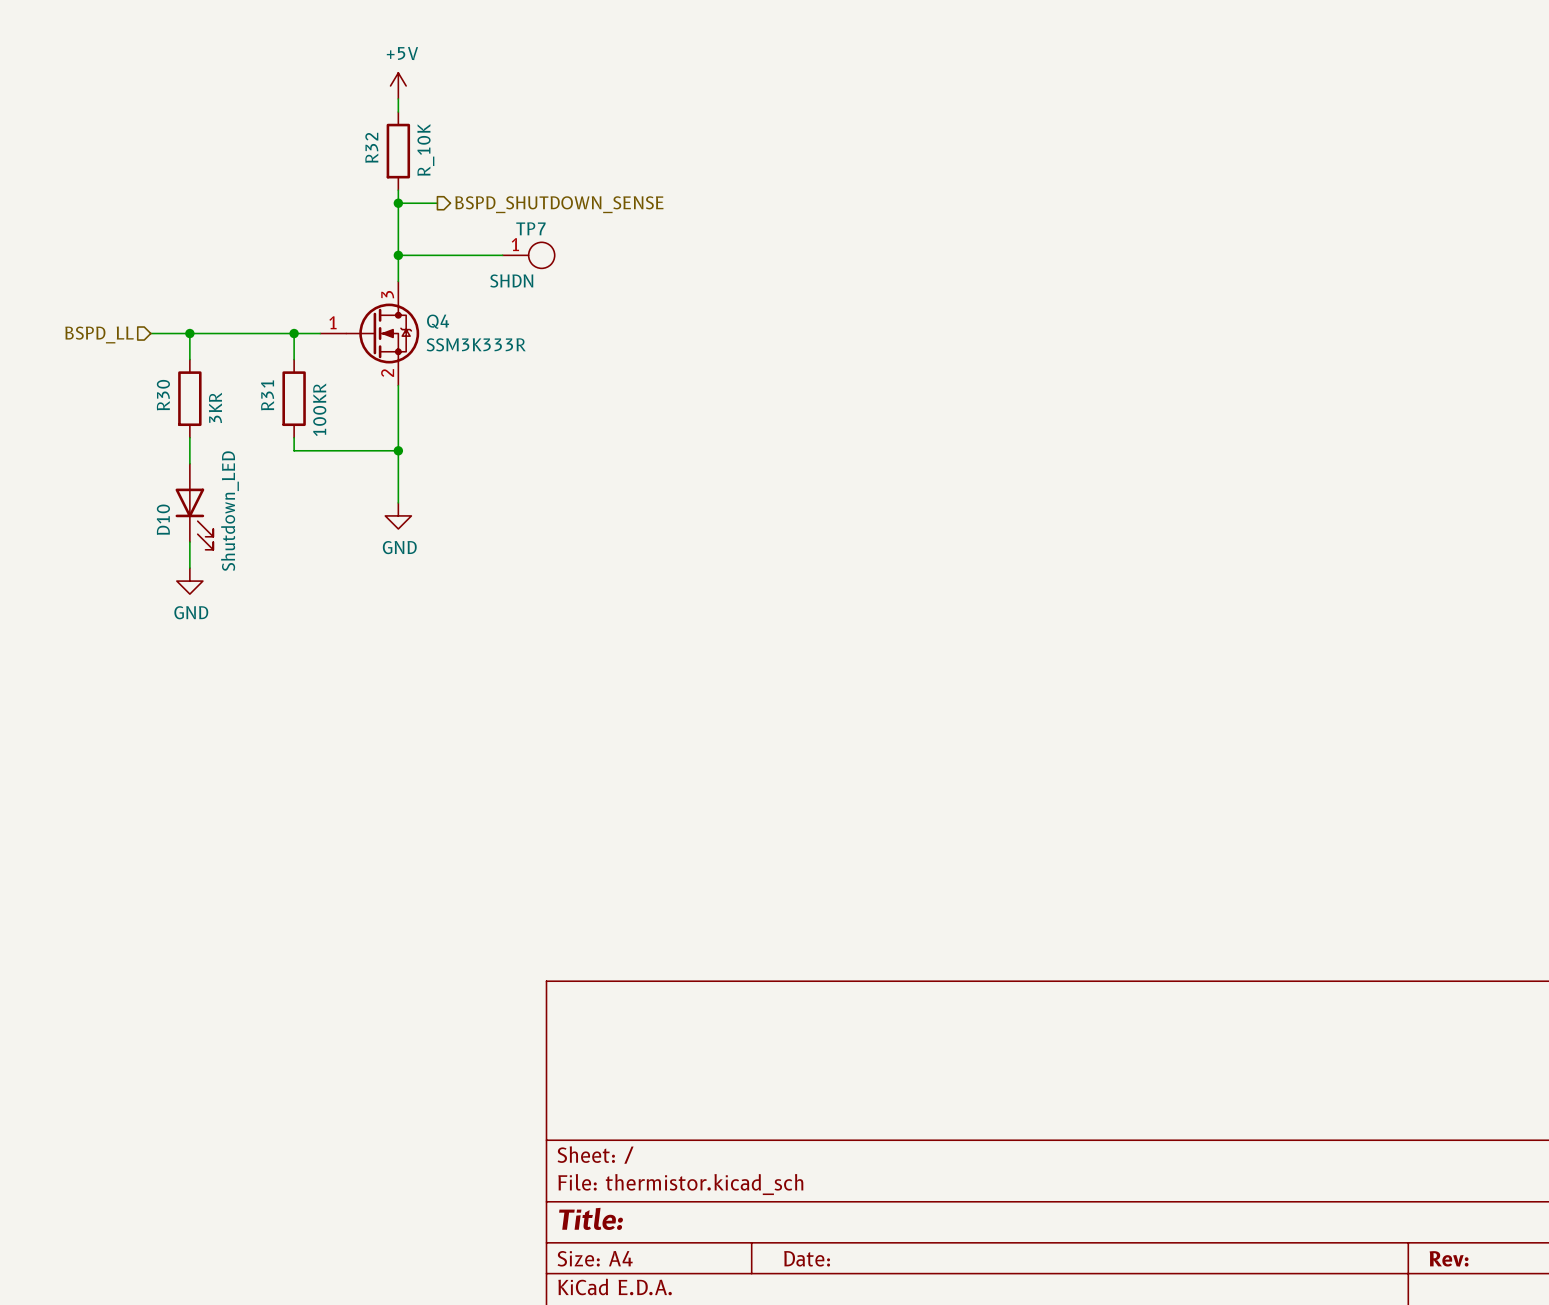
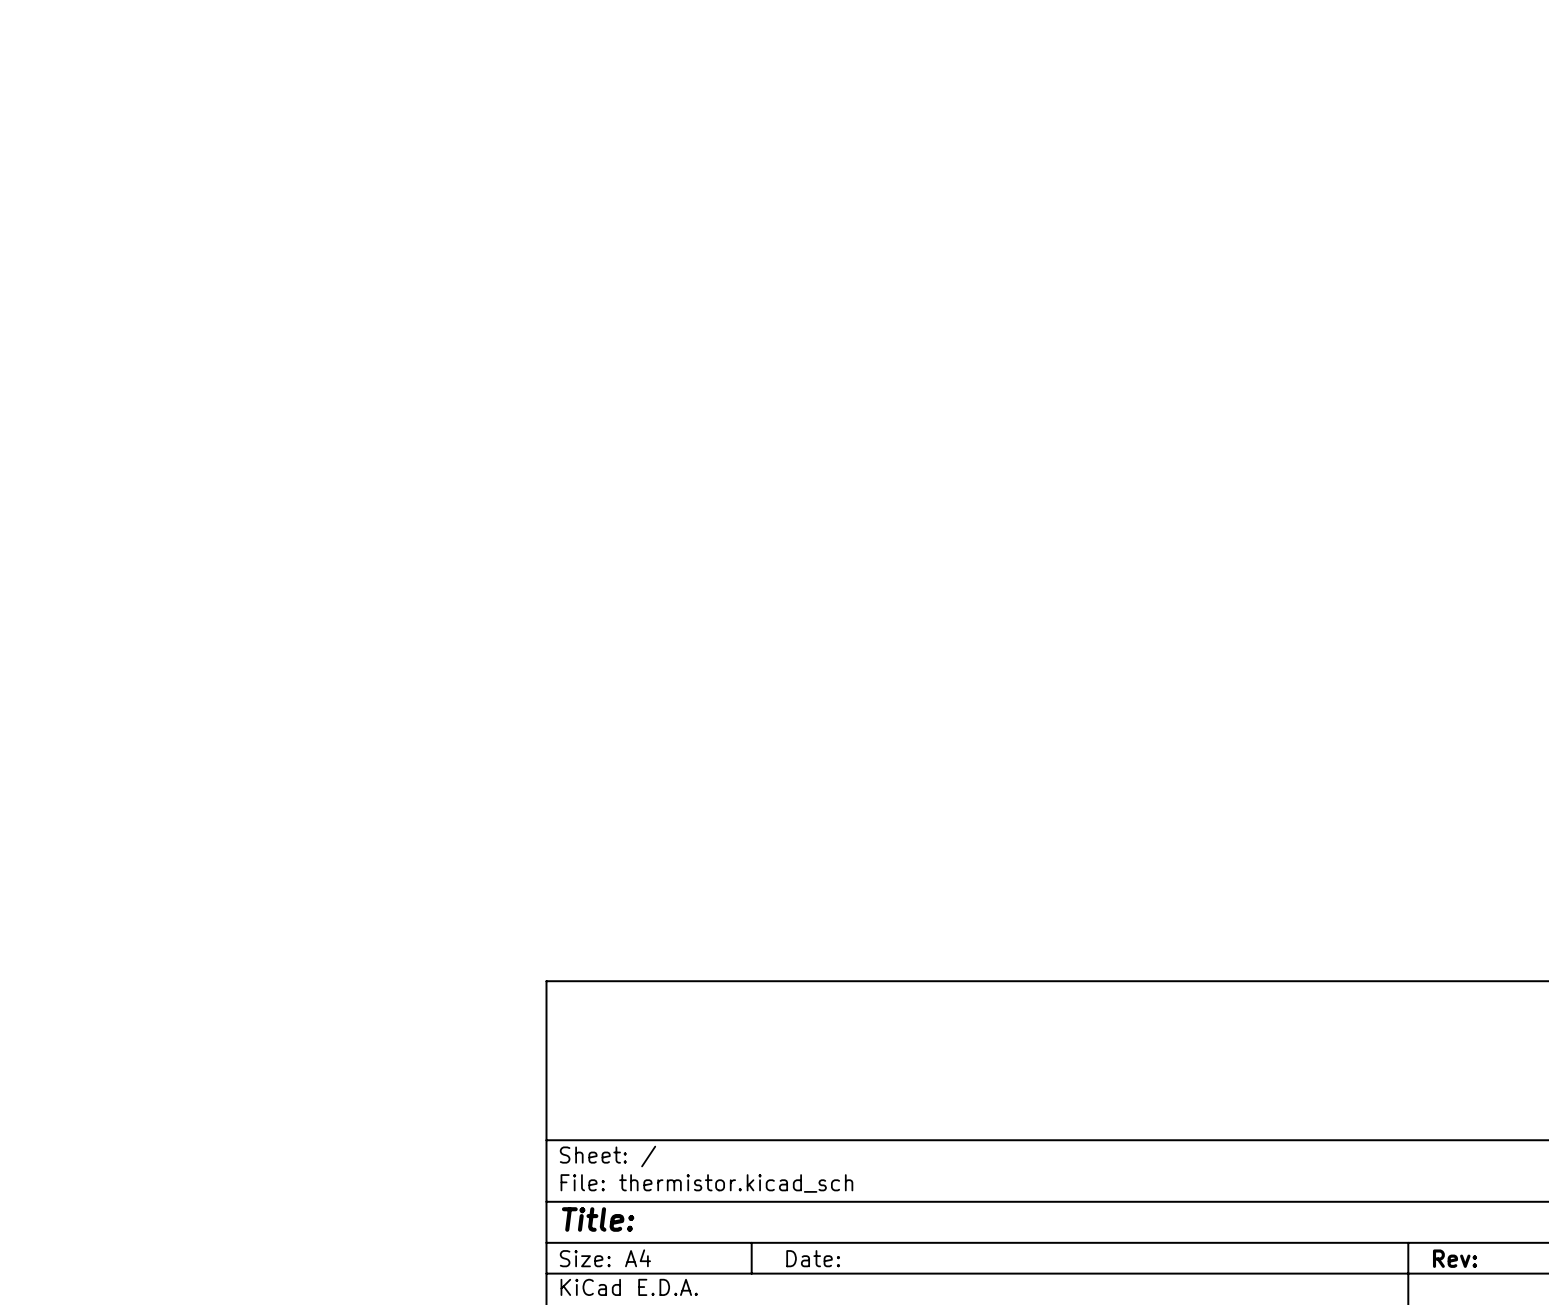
power symbol: +5V (398, 85) -> none
wire: (398, 98) (398, 112) -> none
R32: R_10K (398, 151) -> none
wire: (398, 190) (398, 281) -> none
wire: (398, 203) (437, 203) -> none
junction: (398, 203) -> none
hierarchical label: BSPD_SHUTDOWN_SENSE (559, 204) -> none
wire: (398, 255) (502, 255) -> none
junction: (398, 255) -> none
TP7: SHDN (528, 255) -> none
wire: (150, 333) (320, 333) -> none
wire: (189, 333) (189, 359) -> none
junction: (189, 333) -> none
wire: (294, 333) (294, 359) -> none
junction: (294, 333) -> none
Q4: SSM3K333R (369, 333) -> none
hierarchical label: BSPD_LL (99, 334) -> none
wire: (398, 385) (398, 502) -> none
R30: 3KR (189, 398) -> none
R31: 100KR (294, 398) -> none
wire: (189, 437) (189, 463) -> none
wire: (294, 437) (294, 450) (398, 450) -> none
junction: (398, 450) -> none
D10: Shutdown_LED (194, 506) -> none
power symbol: GND (398, 515) -> none
wire: (189, 542) (189, 568) -> none
power symbol: GND (189, 581) -> none

